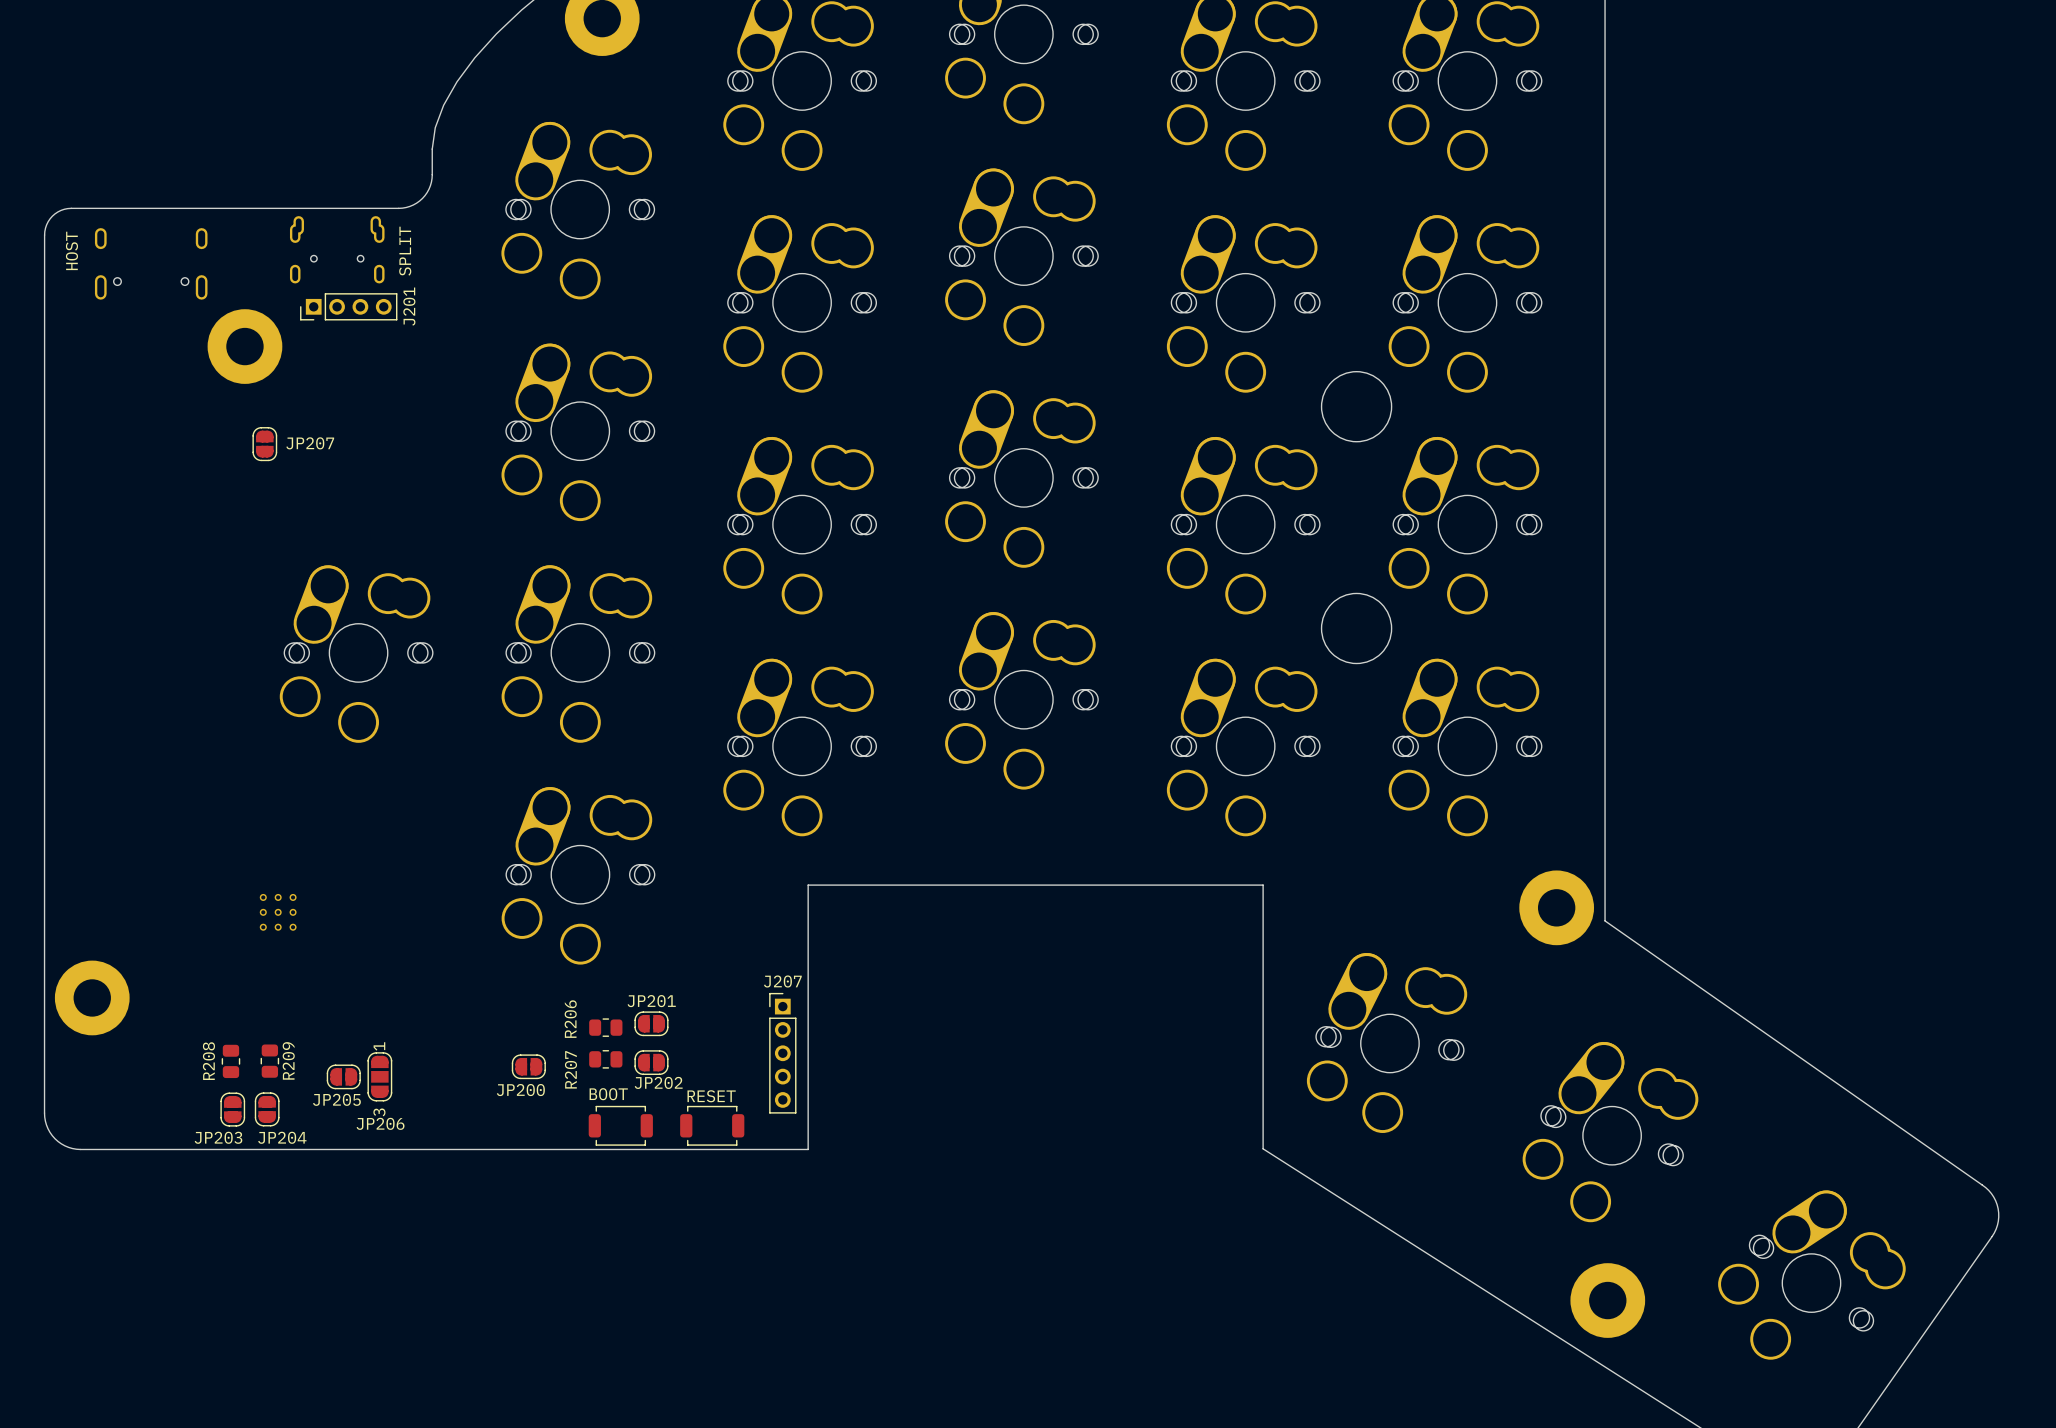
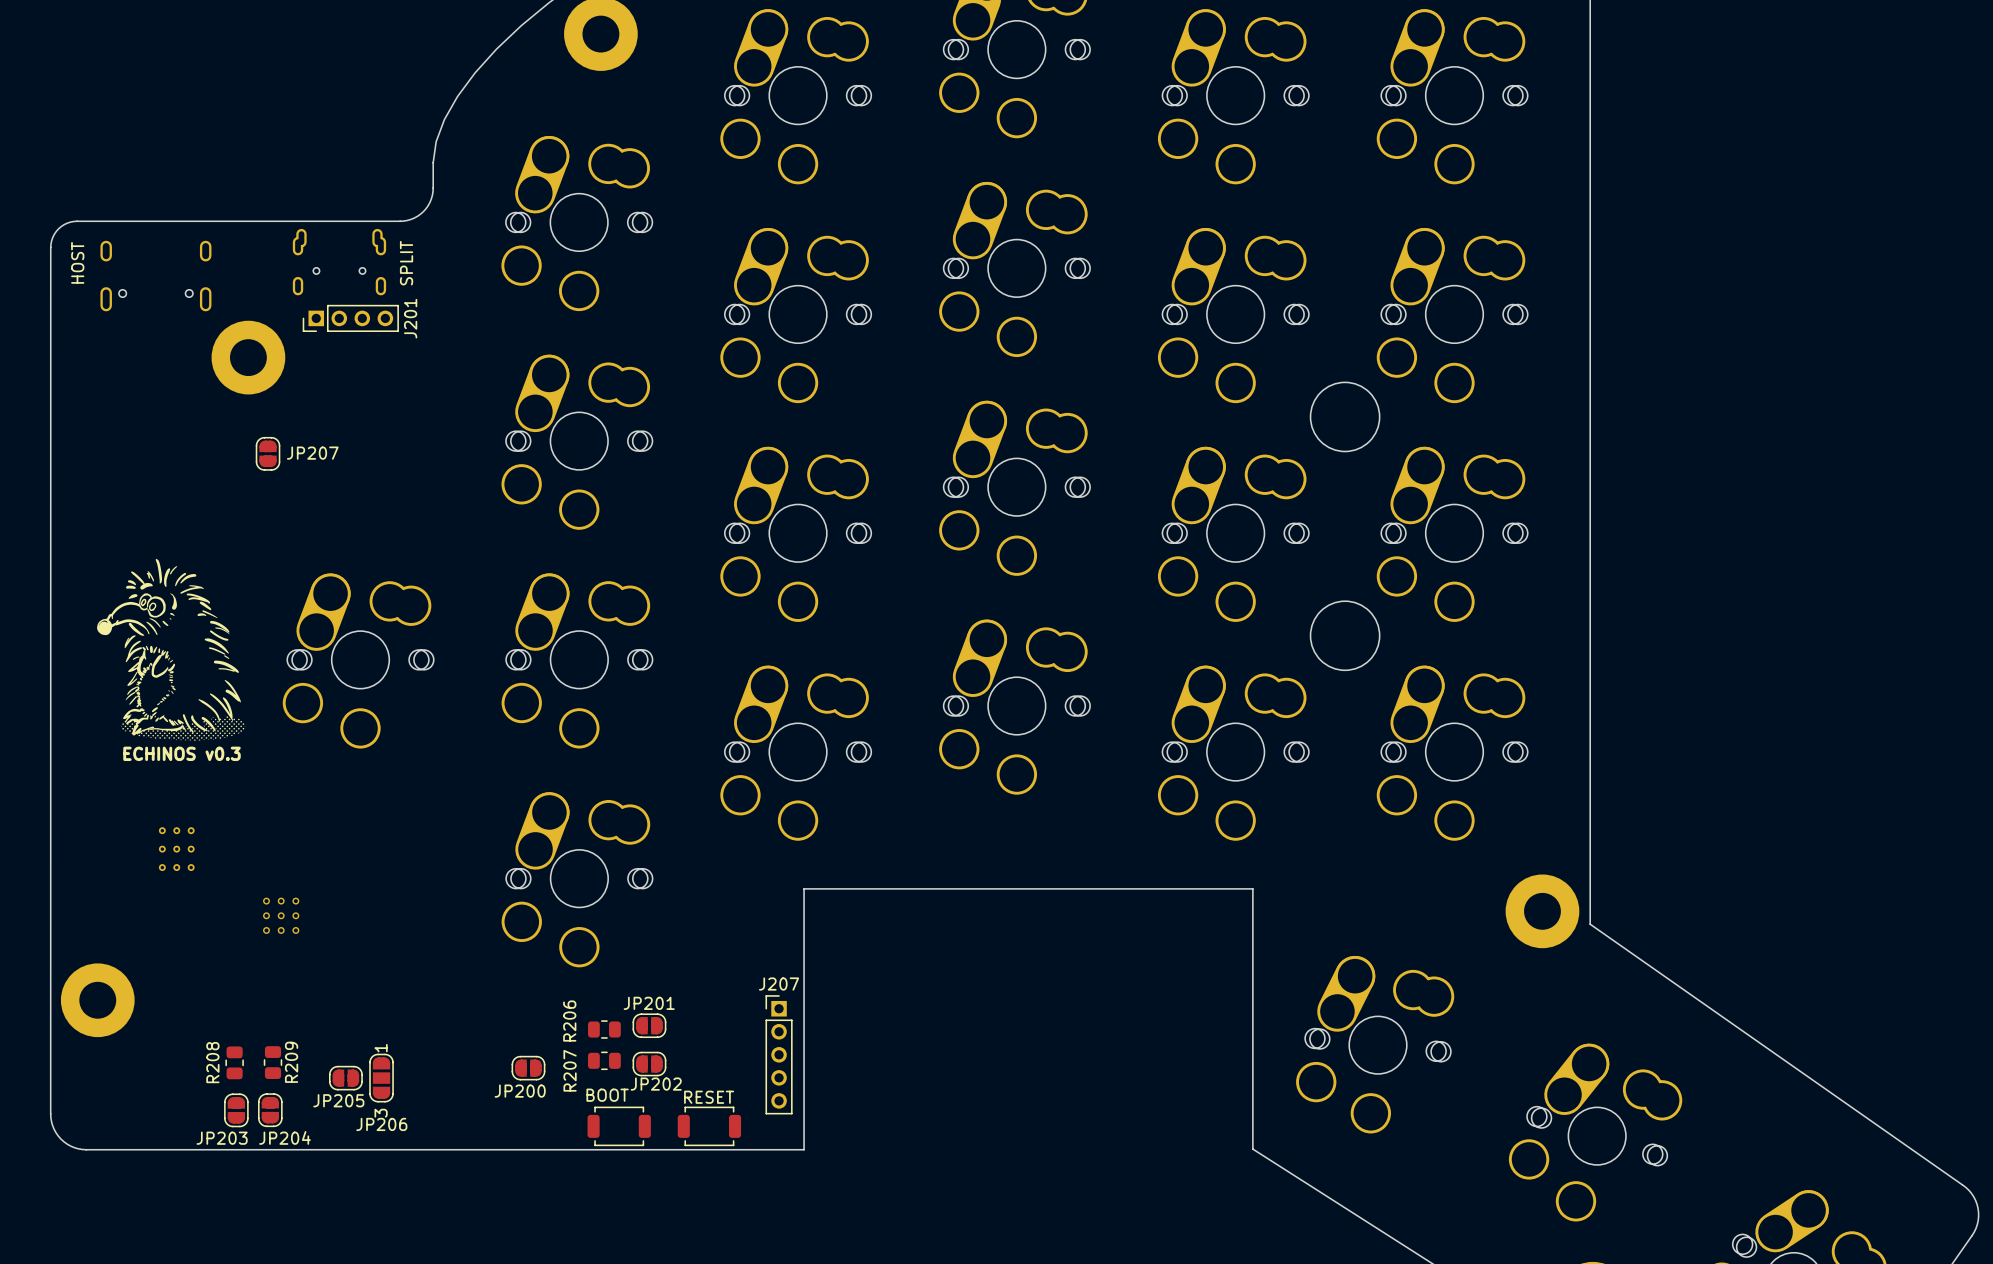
drawing: none -> [97, 559, 246, 741]
text: none -> ECHINOS v0.3 (182, 753)
part: none -> (176, 849)

